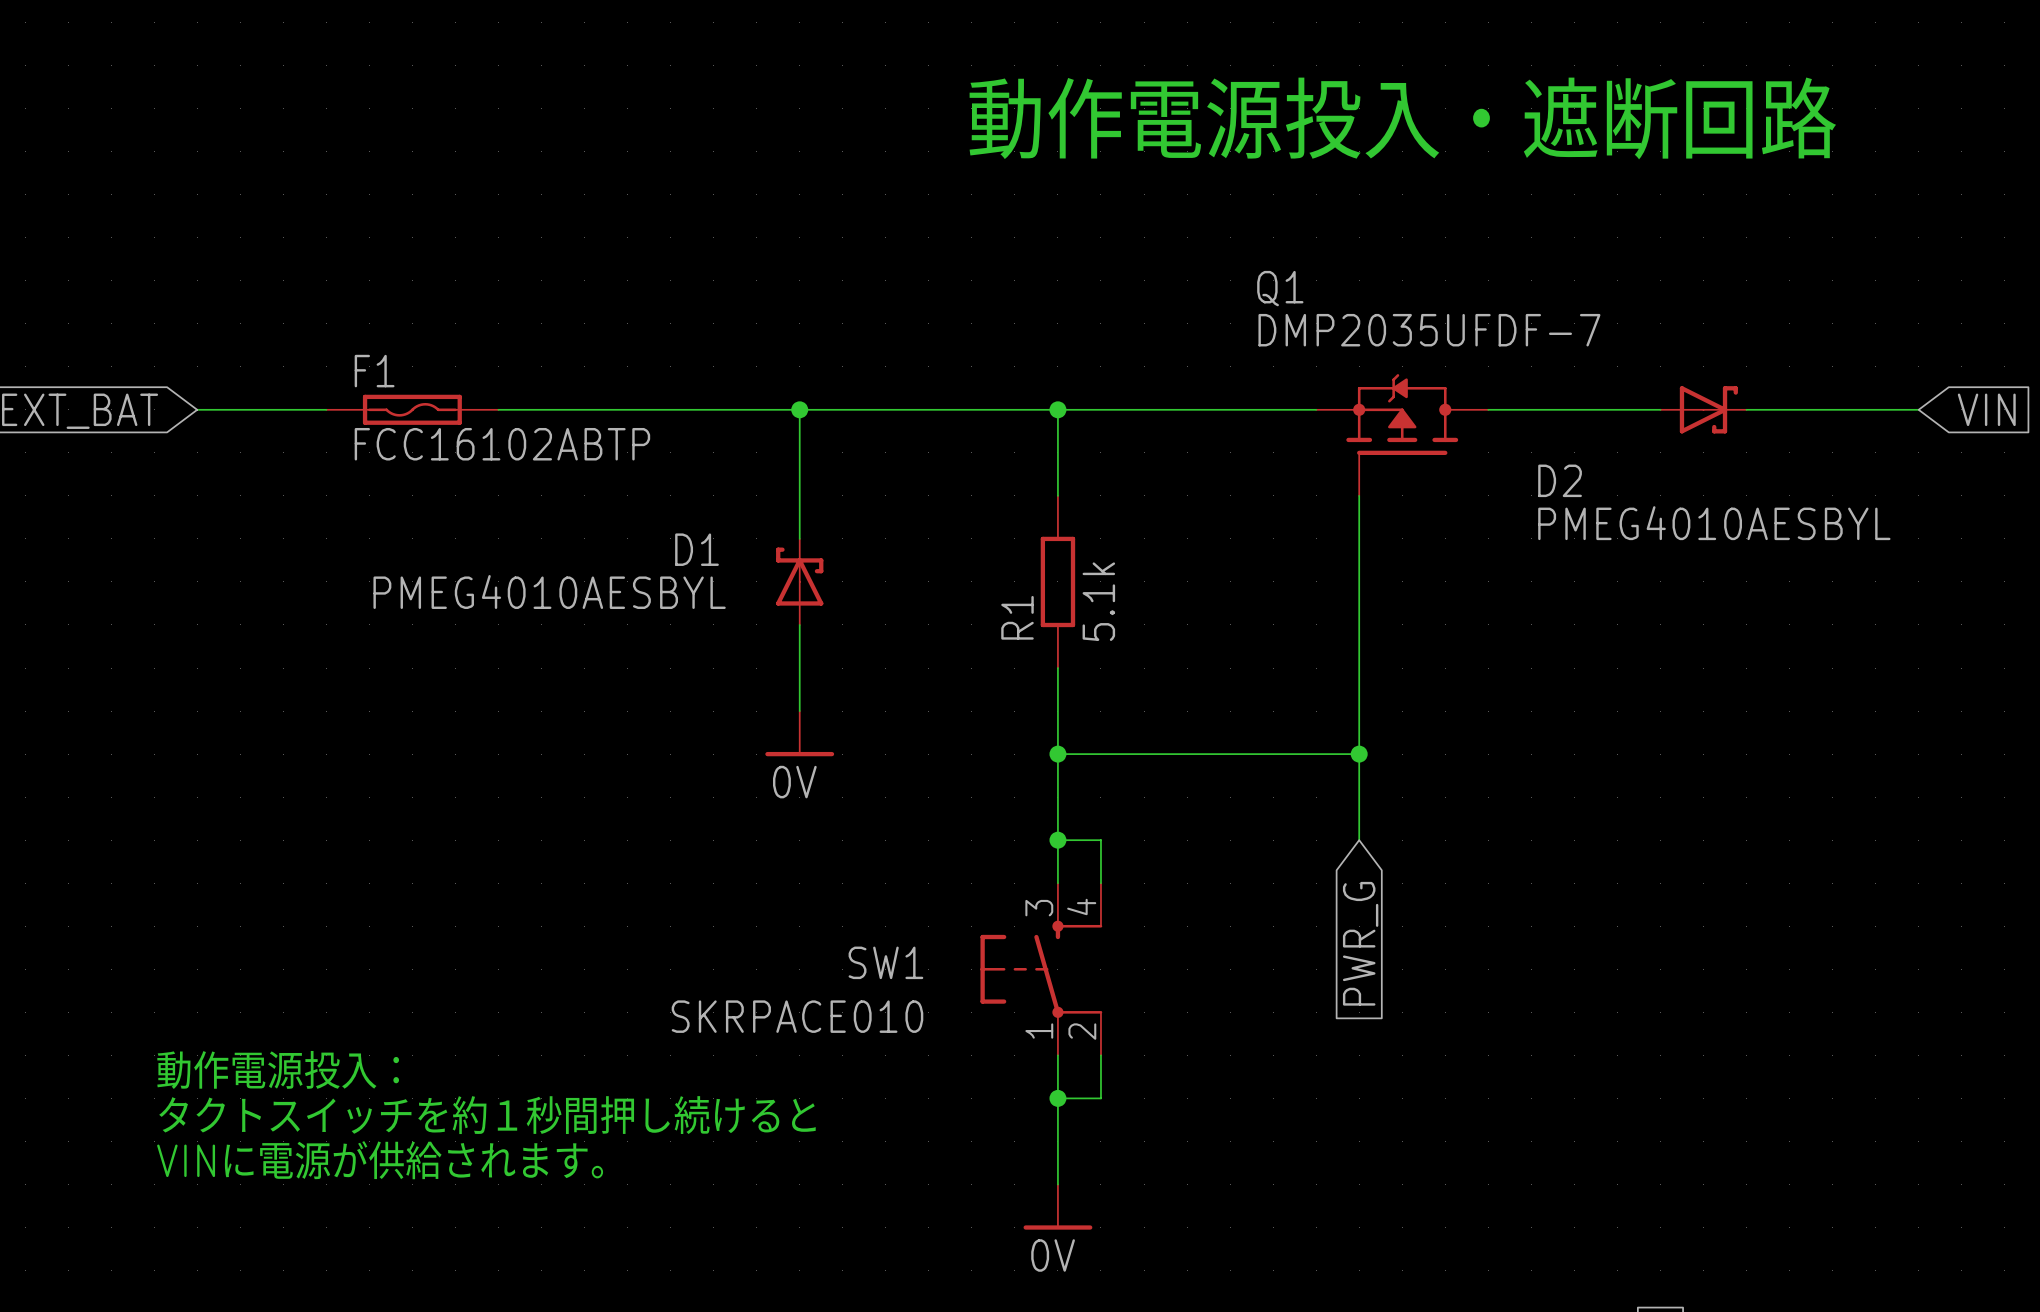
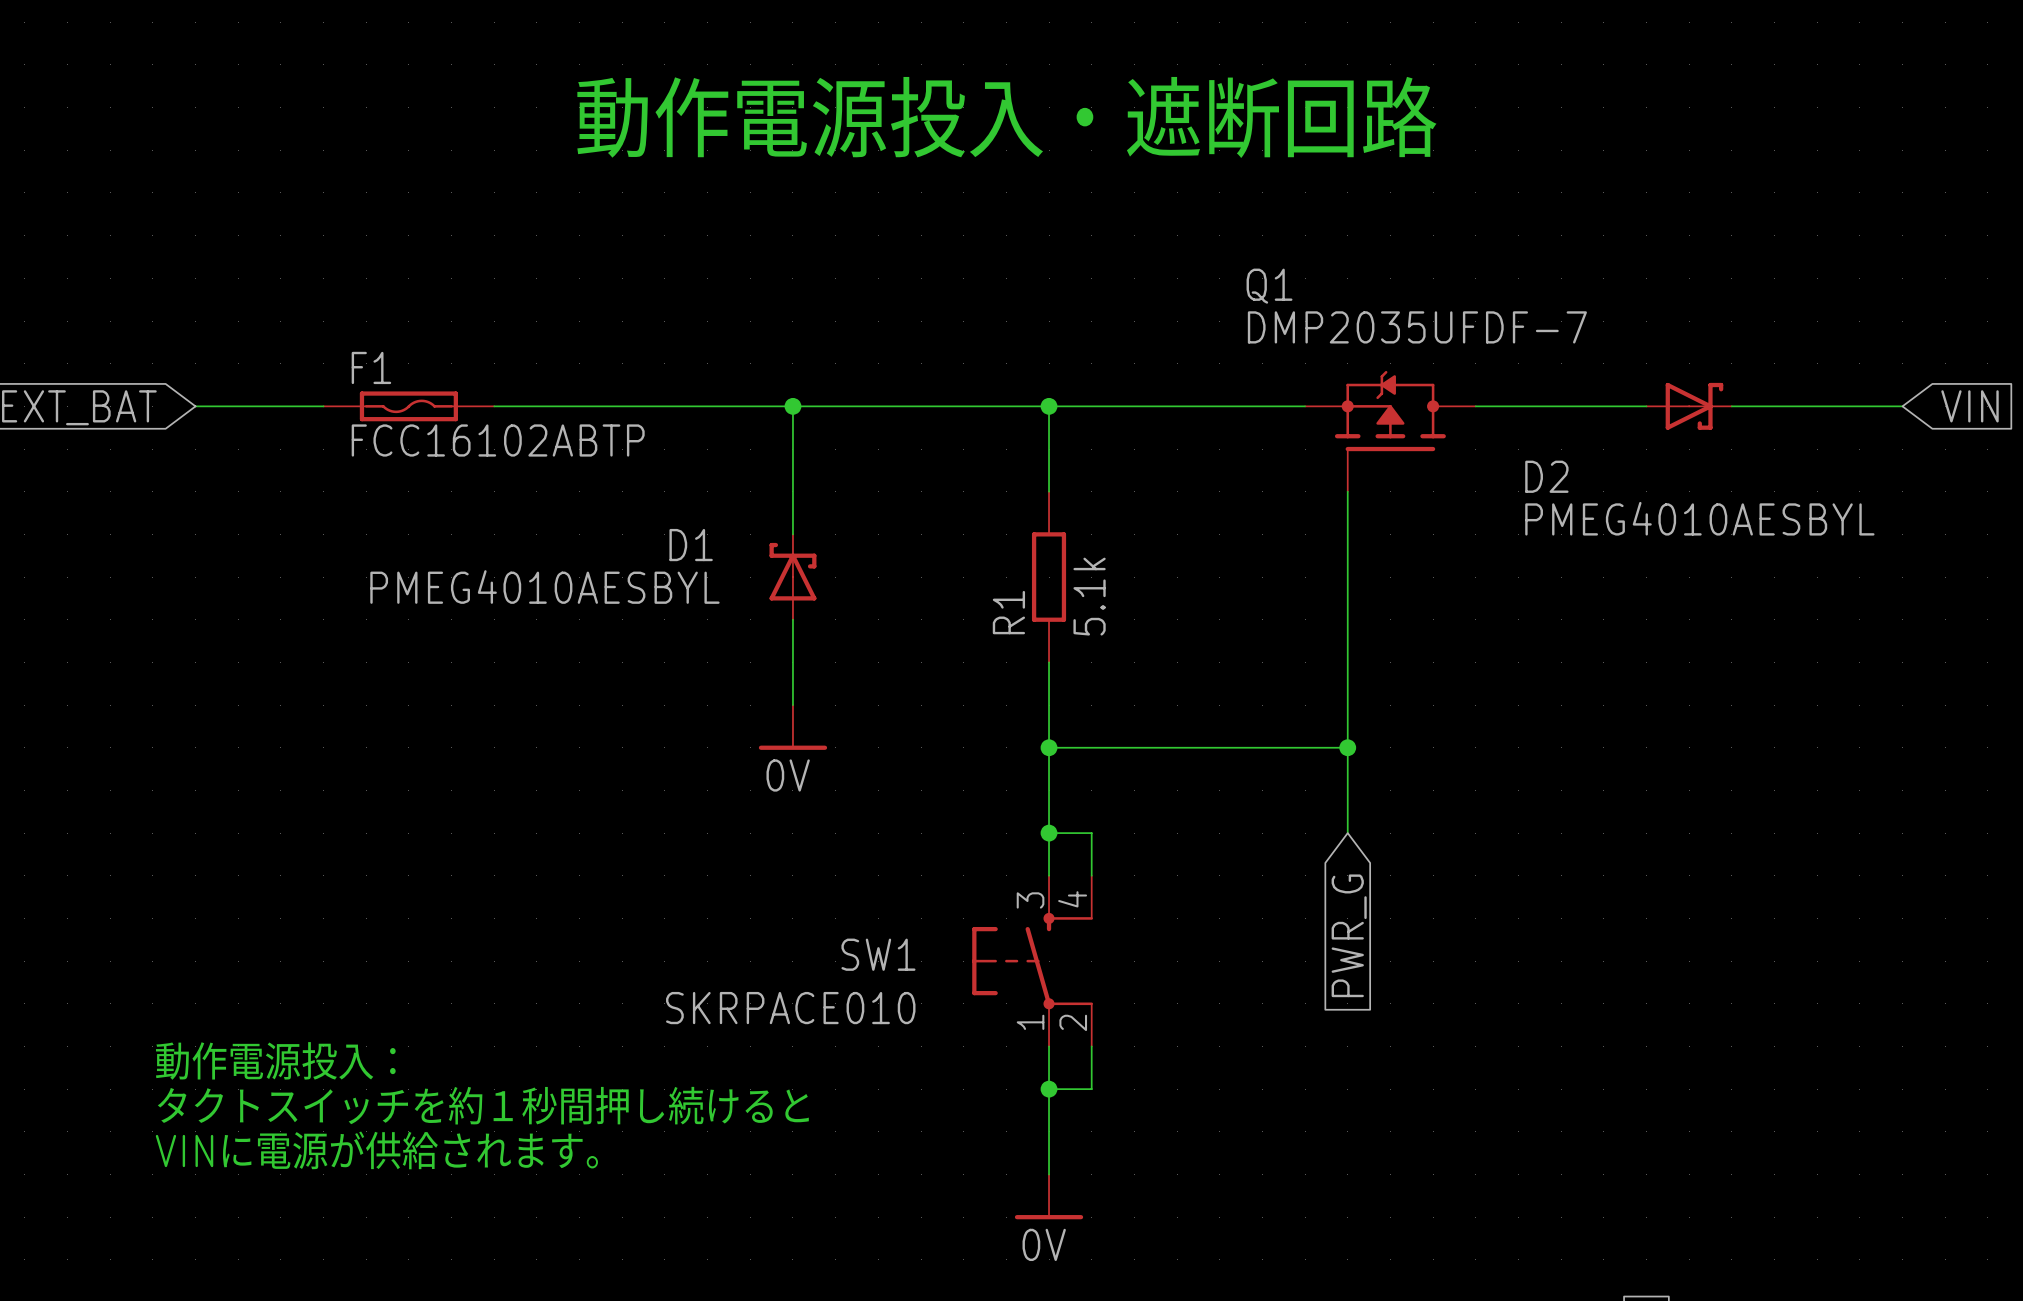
text position: 動作電源投入・遮断回路 (1402, 118) -> 動作電源投入・遮断回路 (1006, 117)

